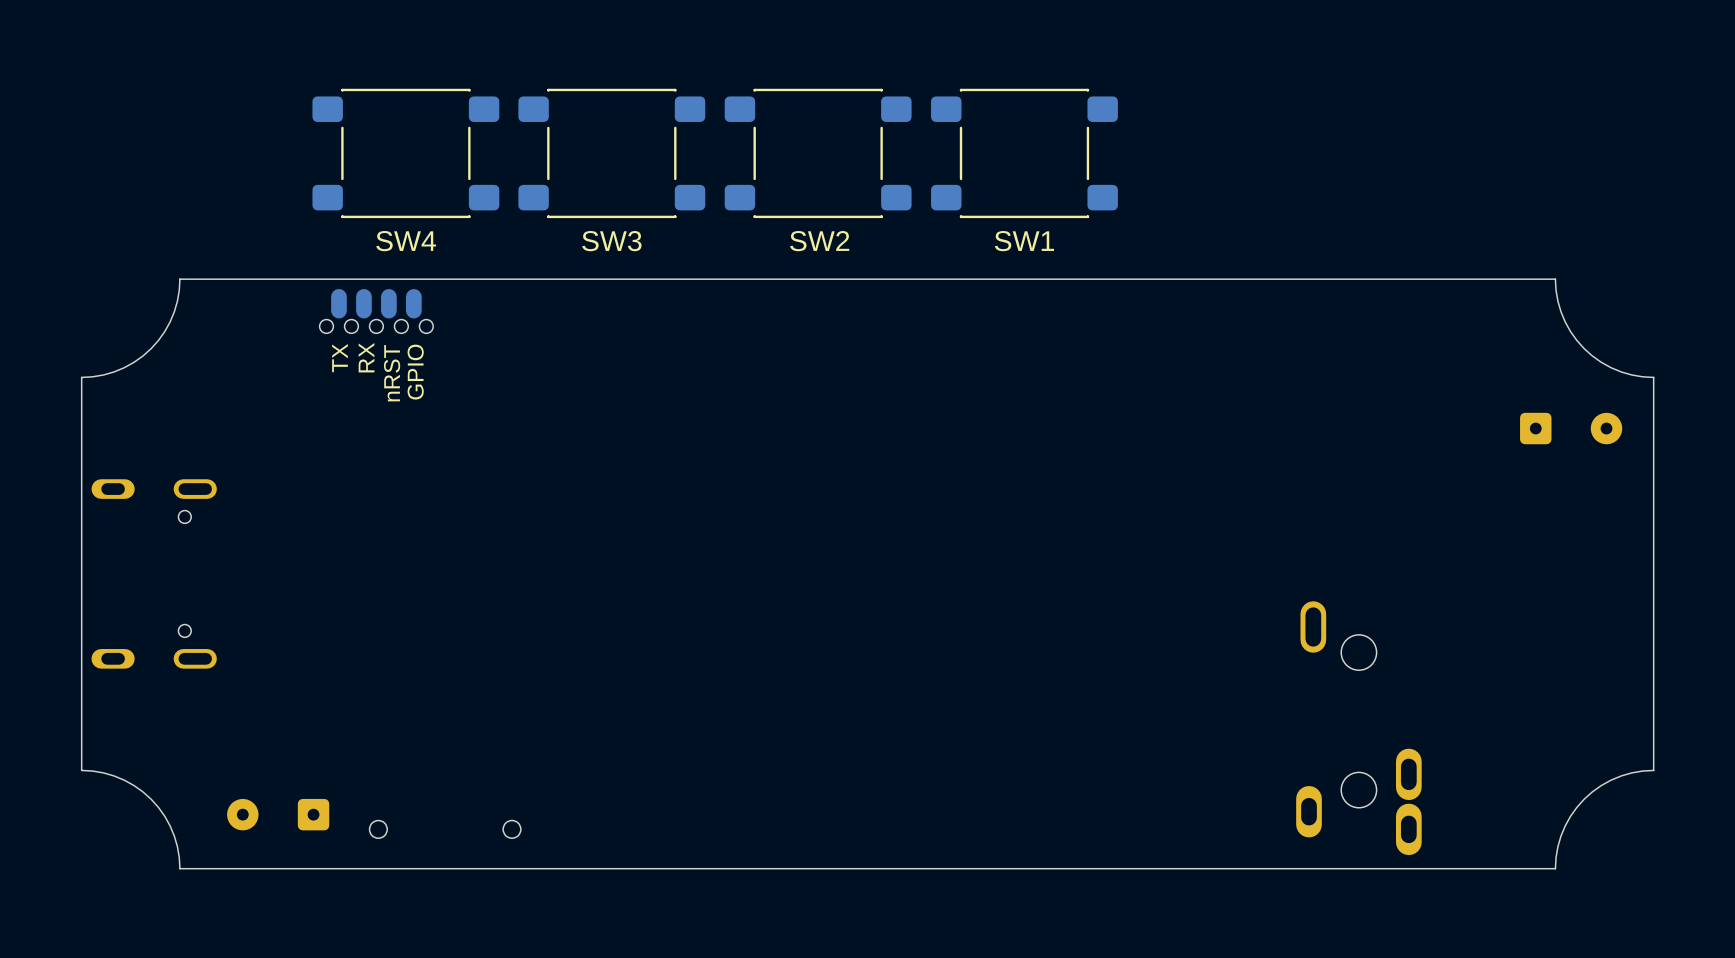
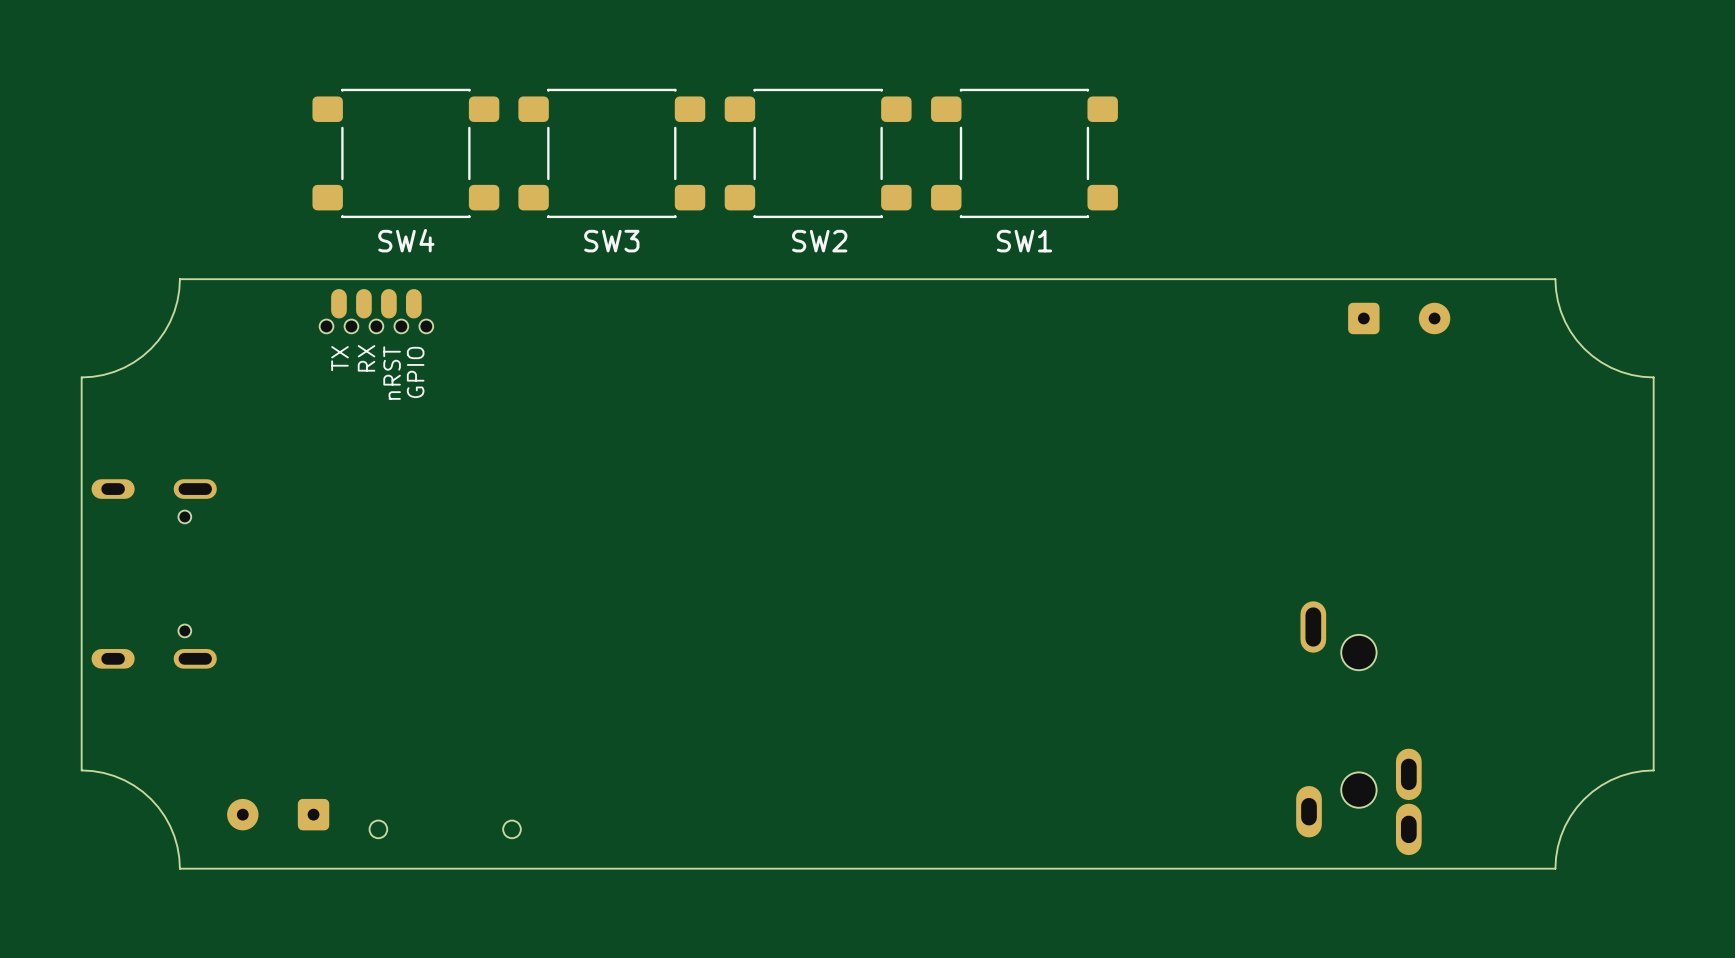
part position: (1571, 428) -> (1399, 318)

